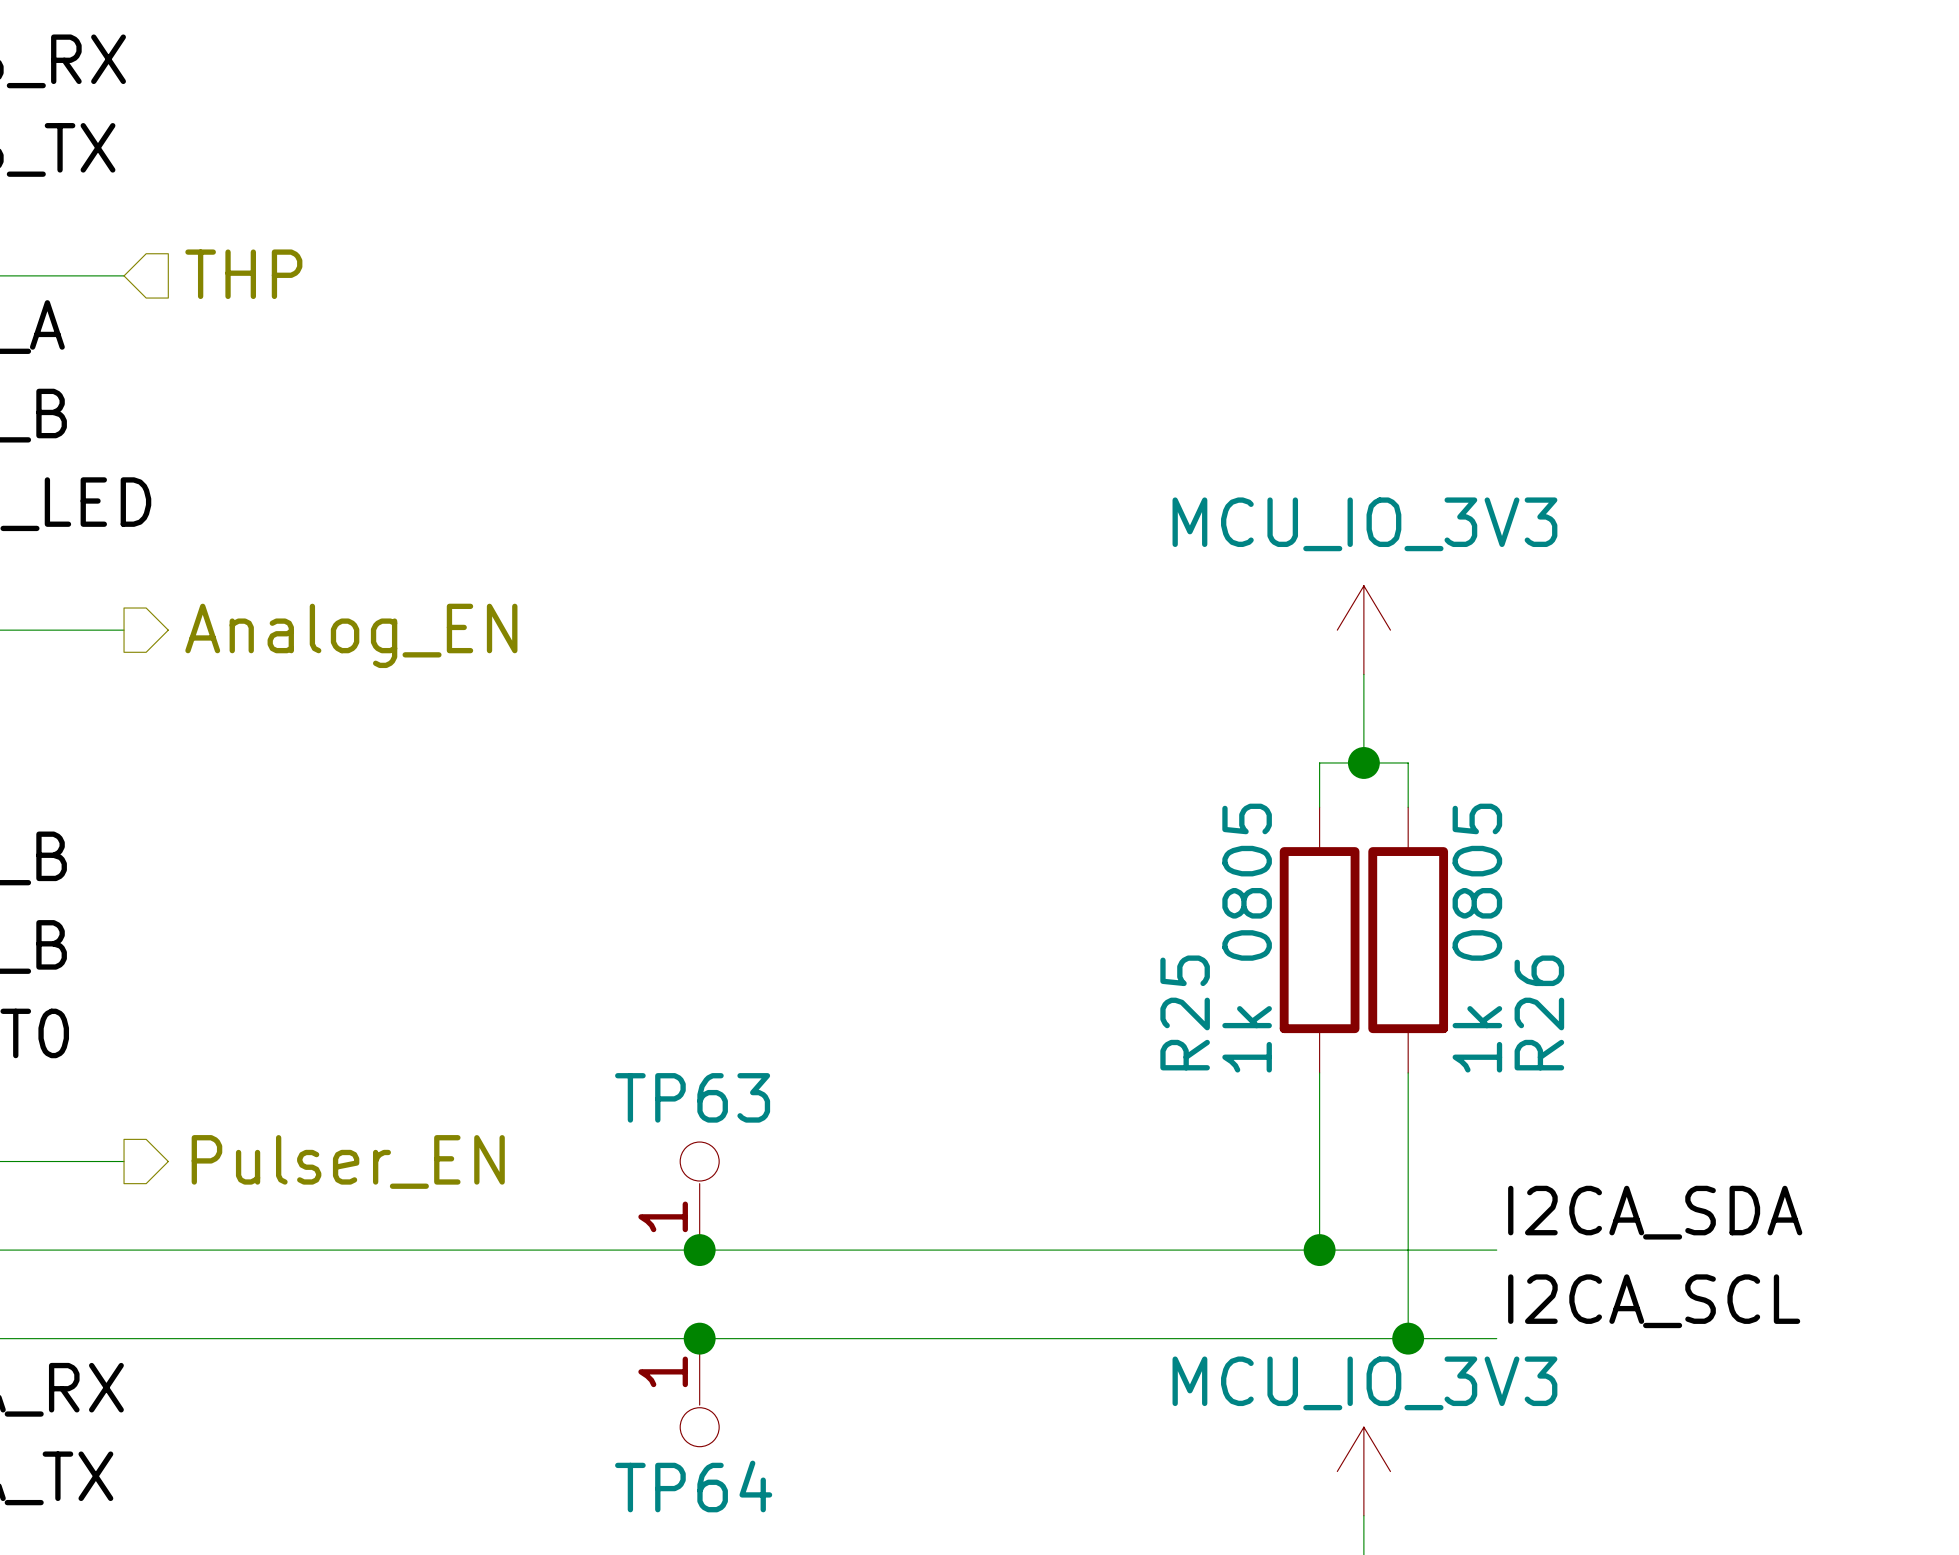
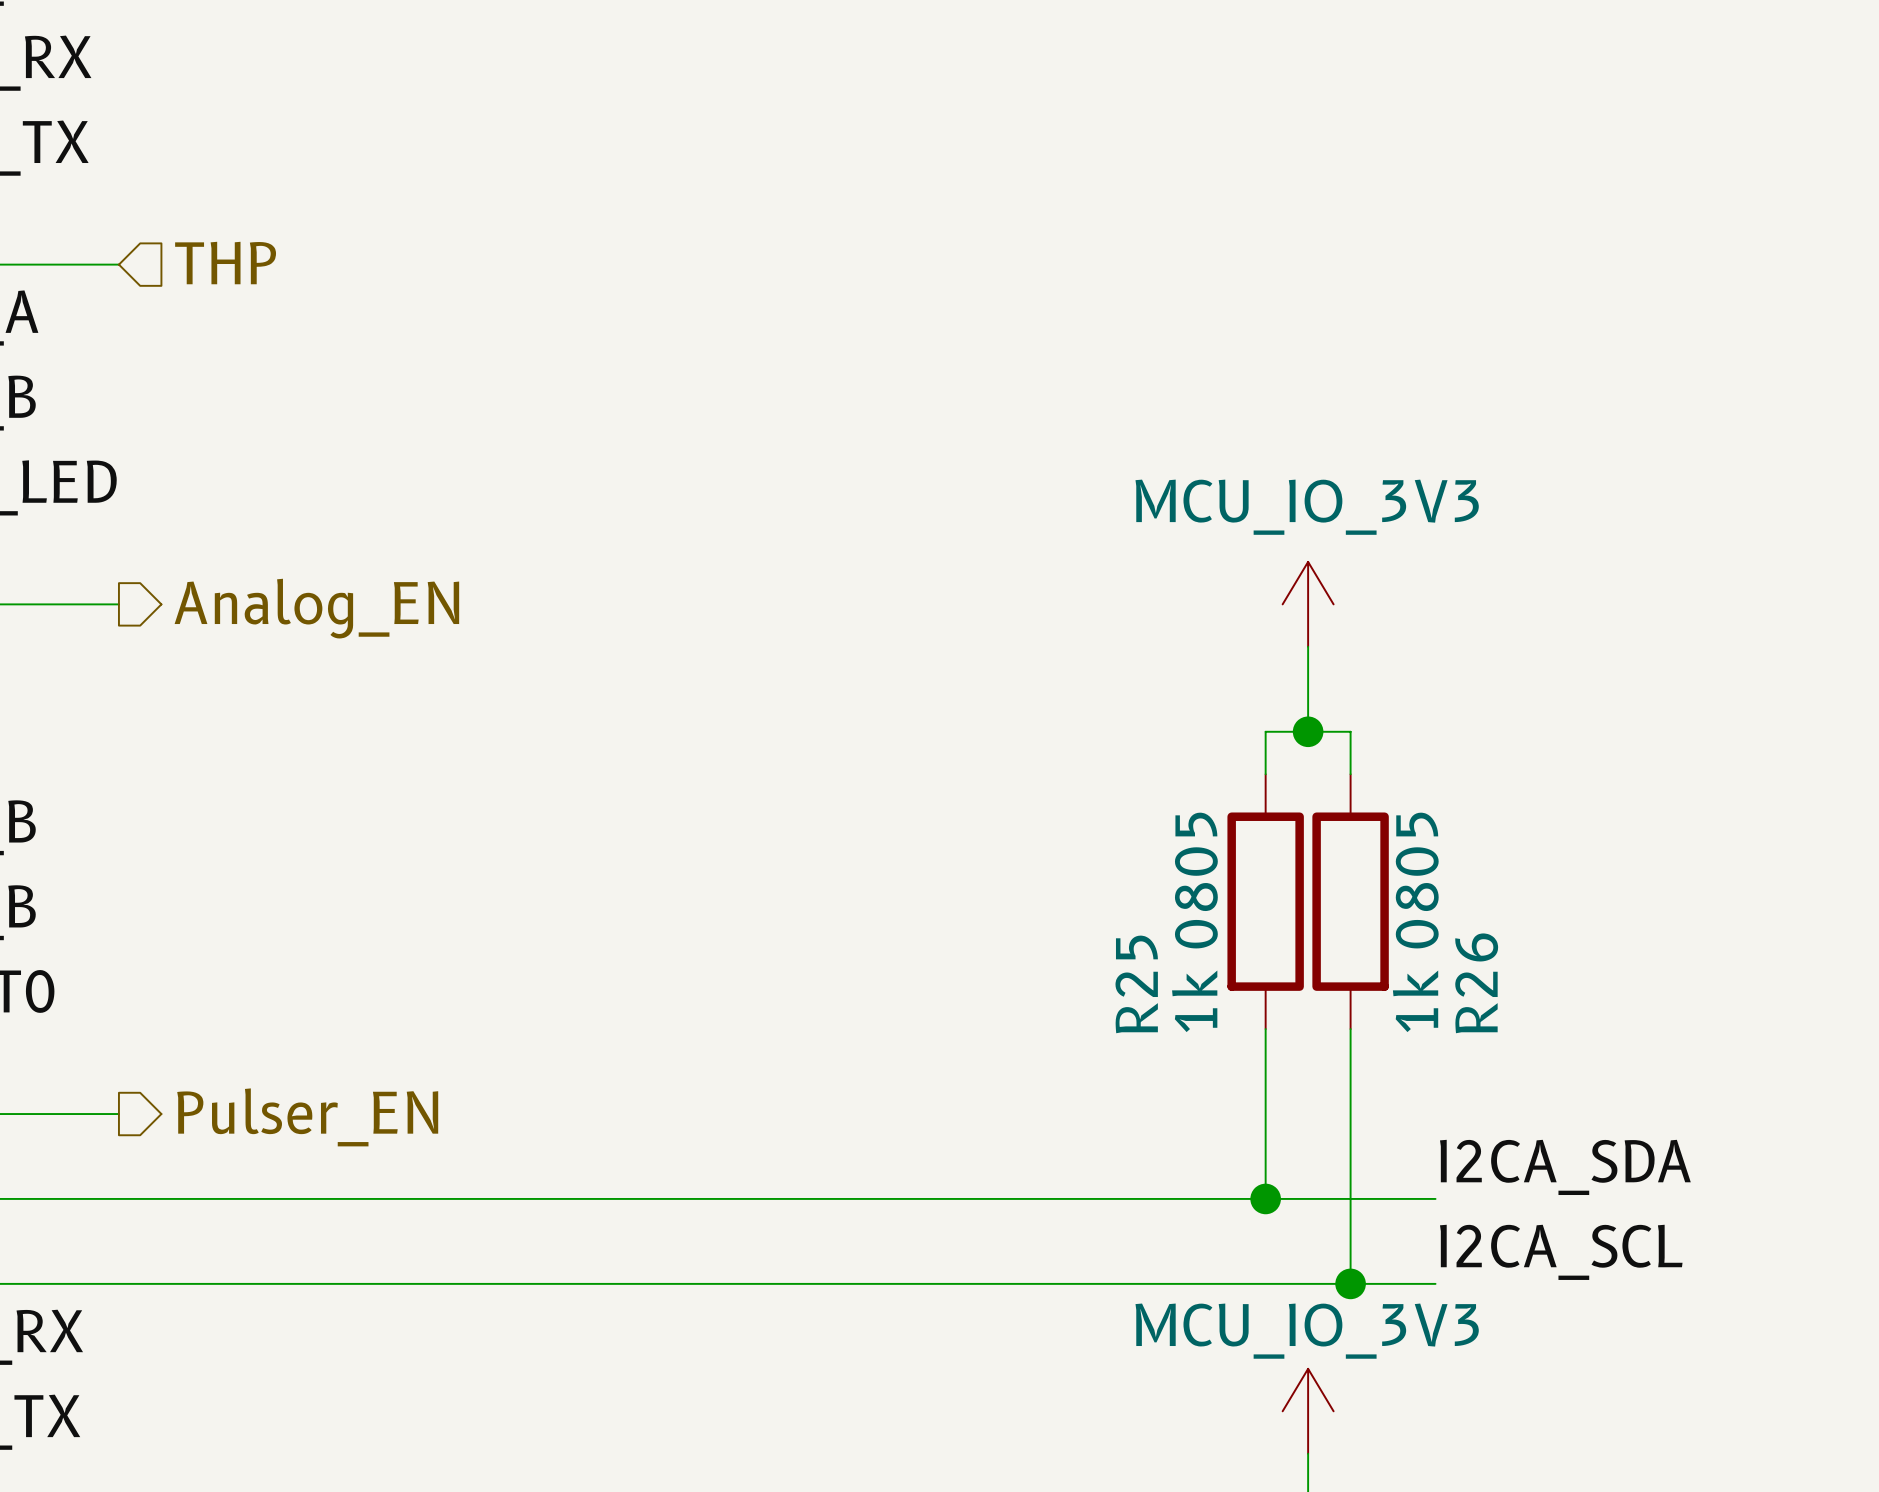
TP63: (699, 1196) -> none
junction: (699, 1250) -> none
junction: (699, 1338) -> none
TP64: (699, 1392) -> none

